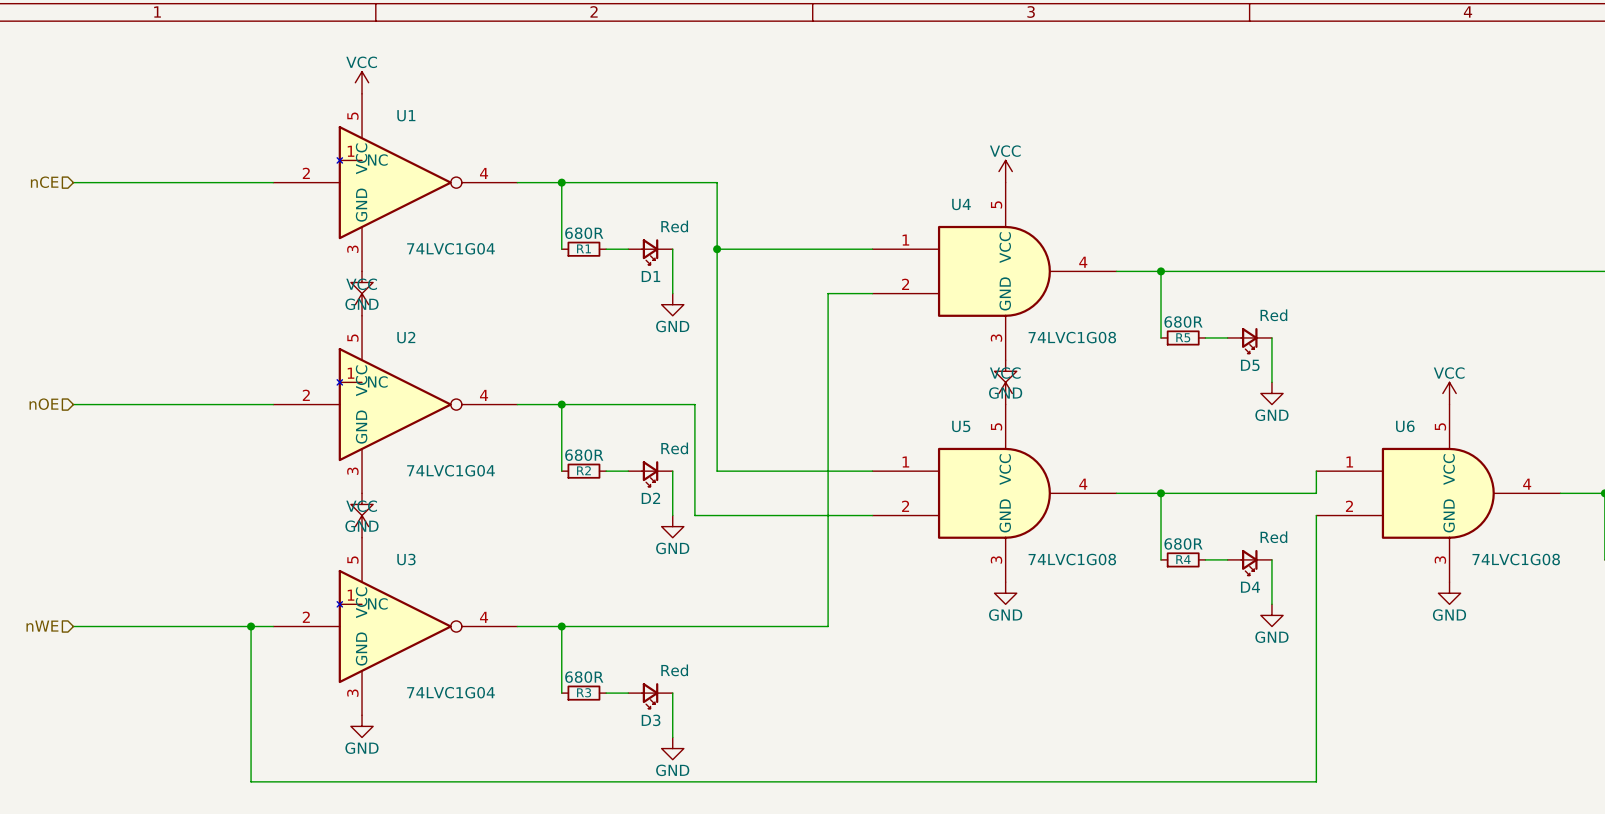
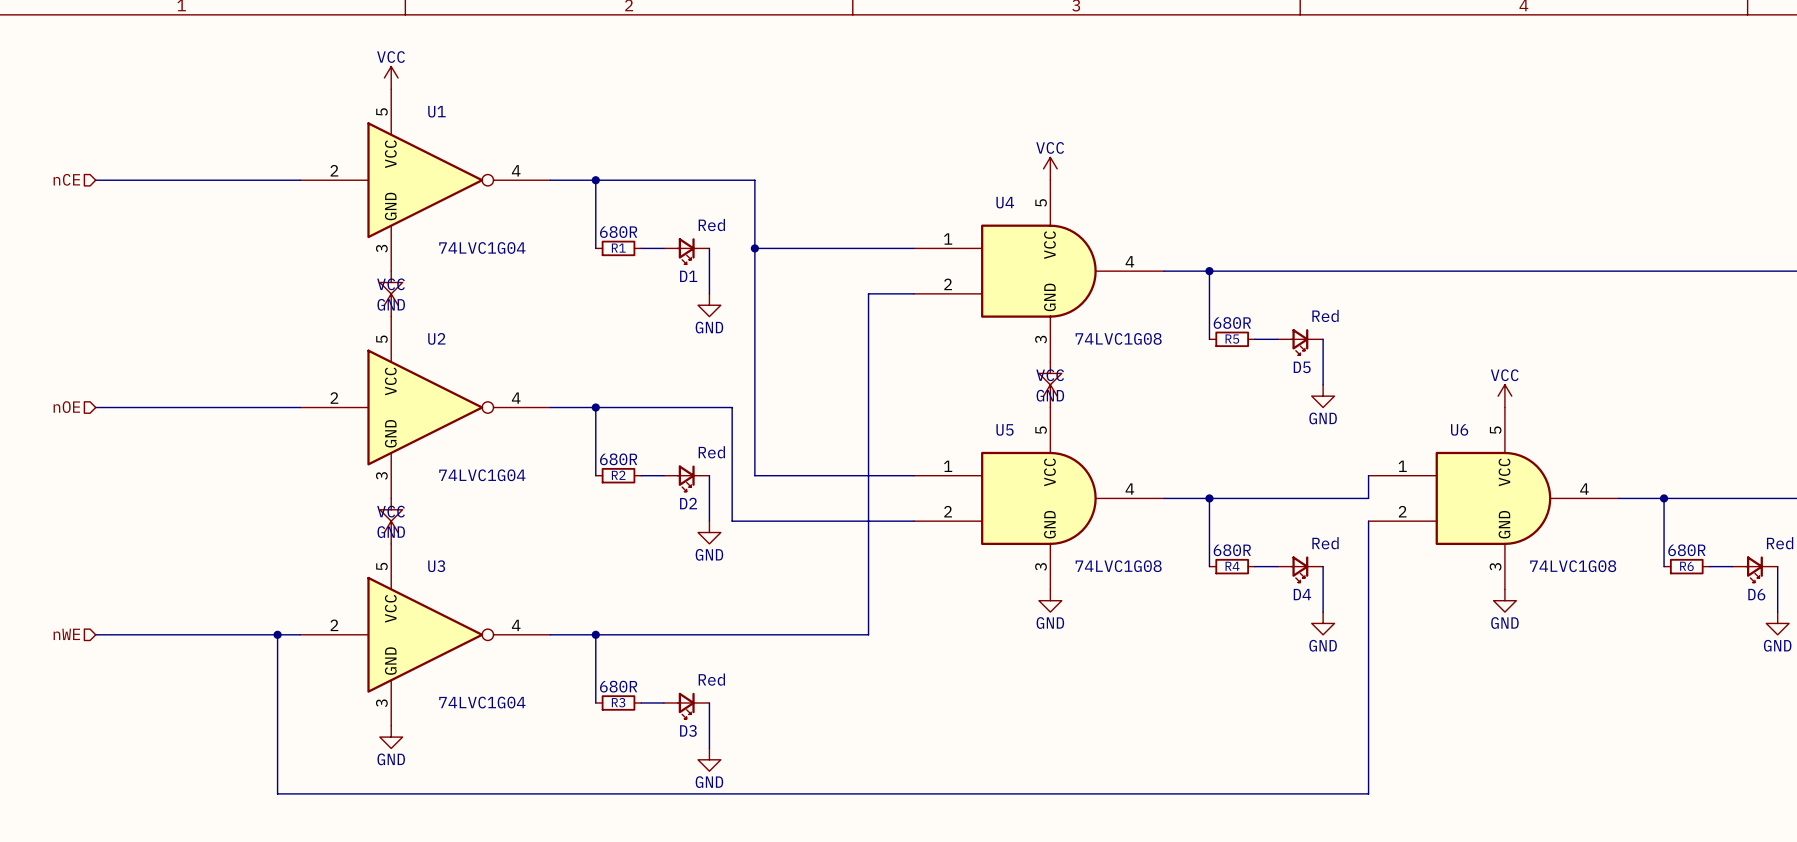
U1 symbol: [273, 93, 518, 272] -> [300, 89, 551, 272]
U2 symbol: [273, 315, 518, 494] -> [300, 316, 551, 499]
U3 symbol: [273, 537, 518, 716] -> [300, 543, 551, 726]

